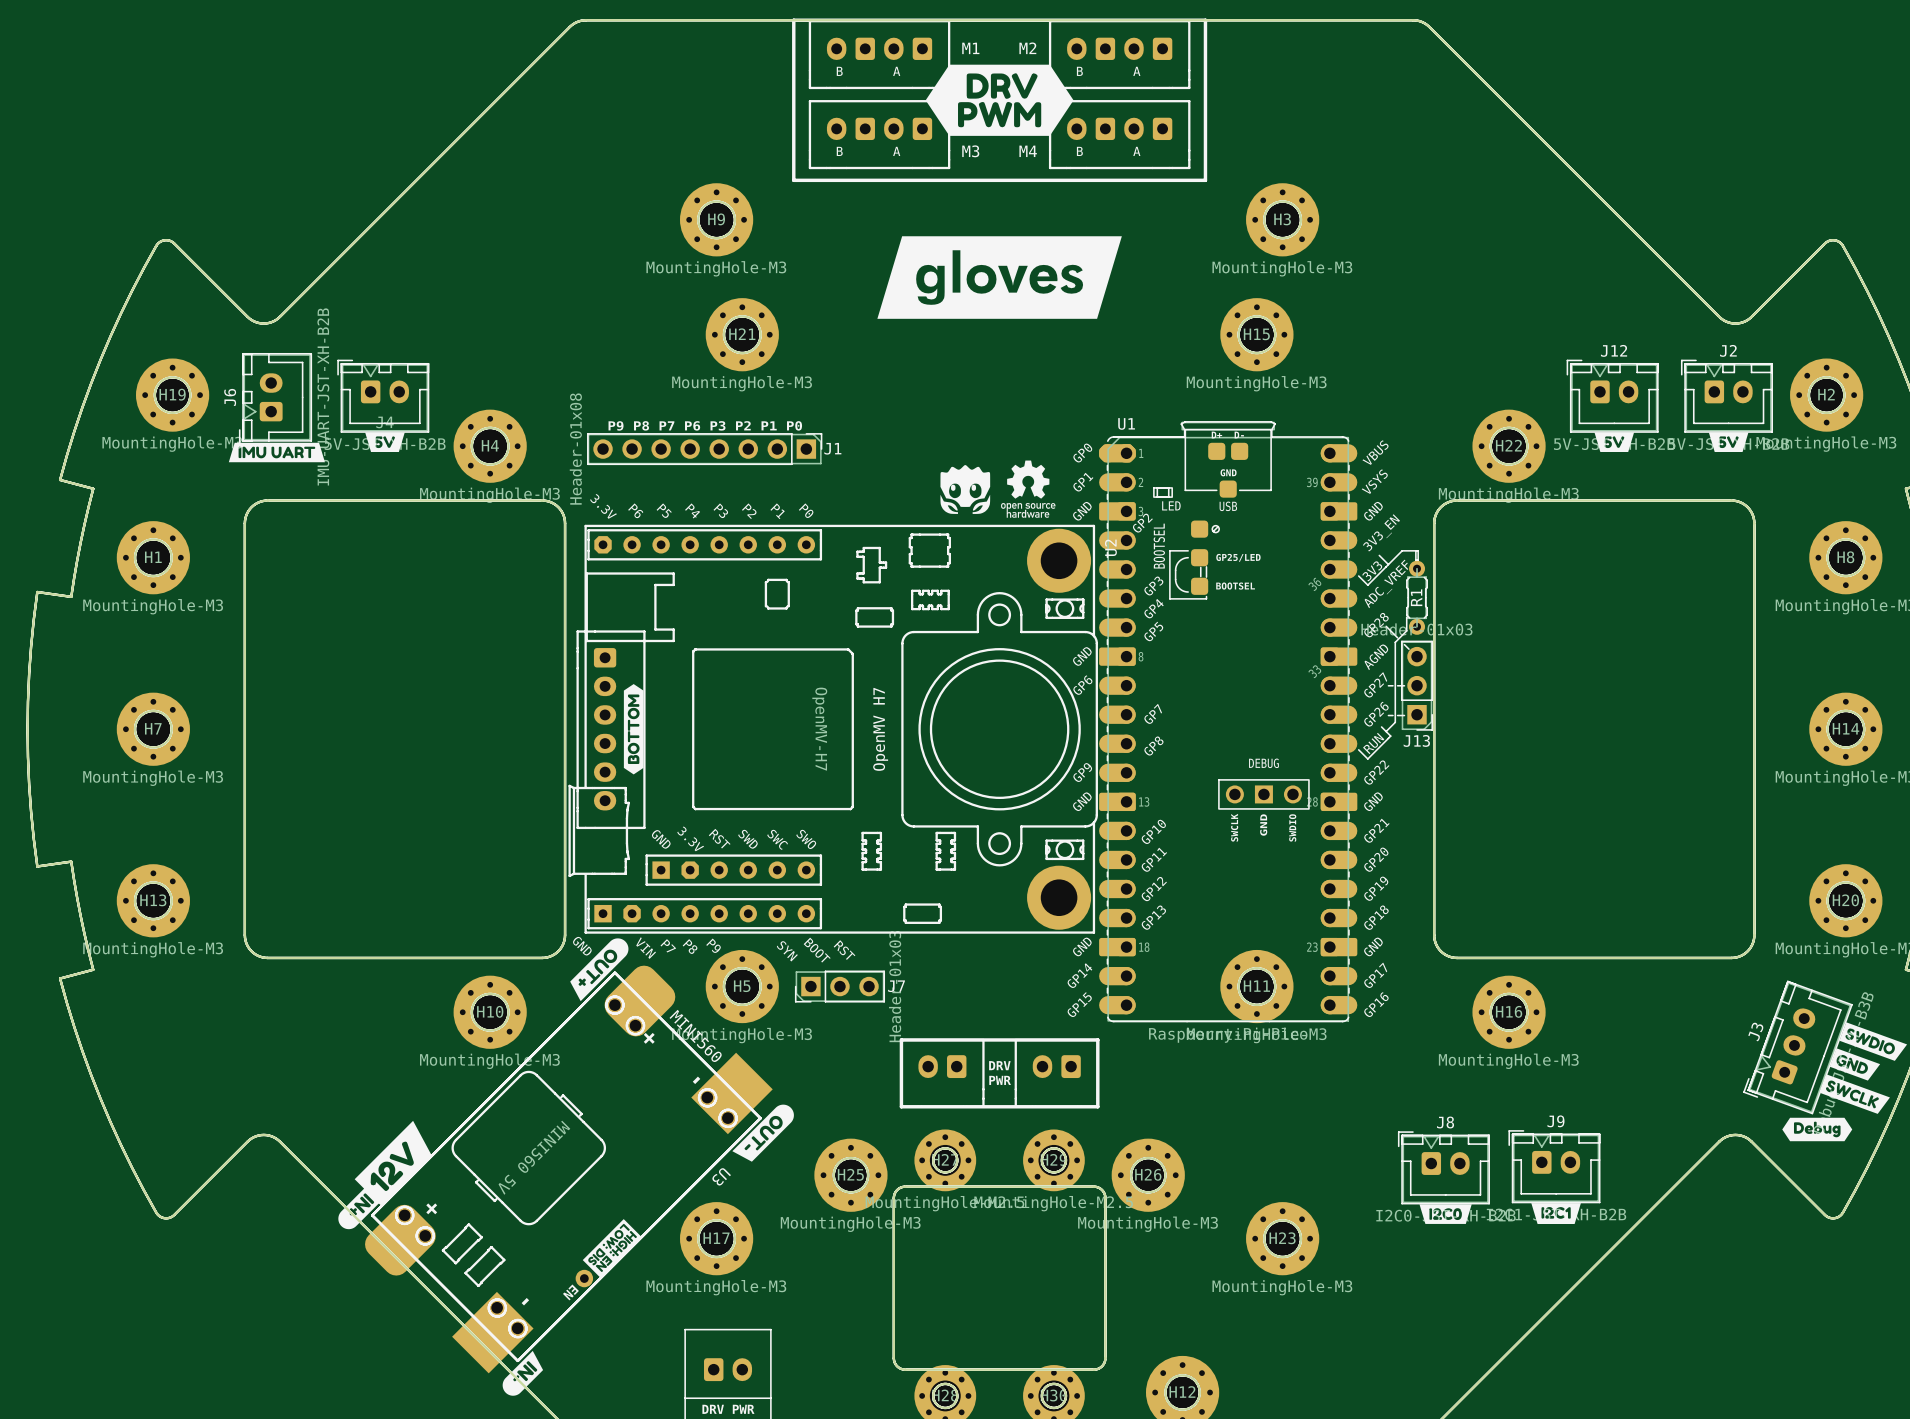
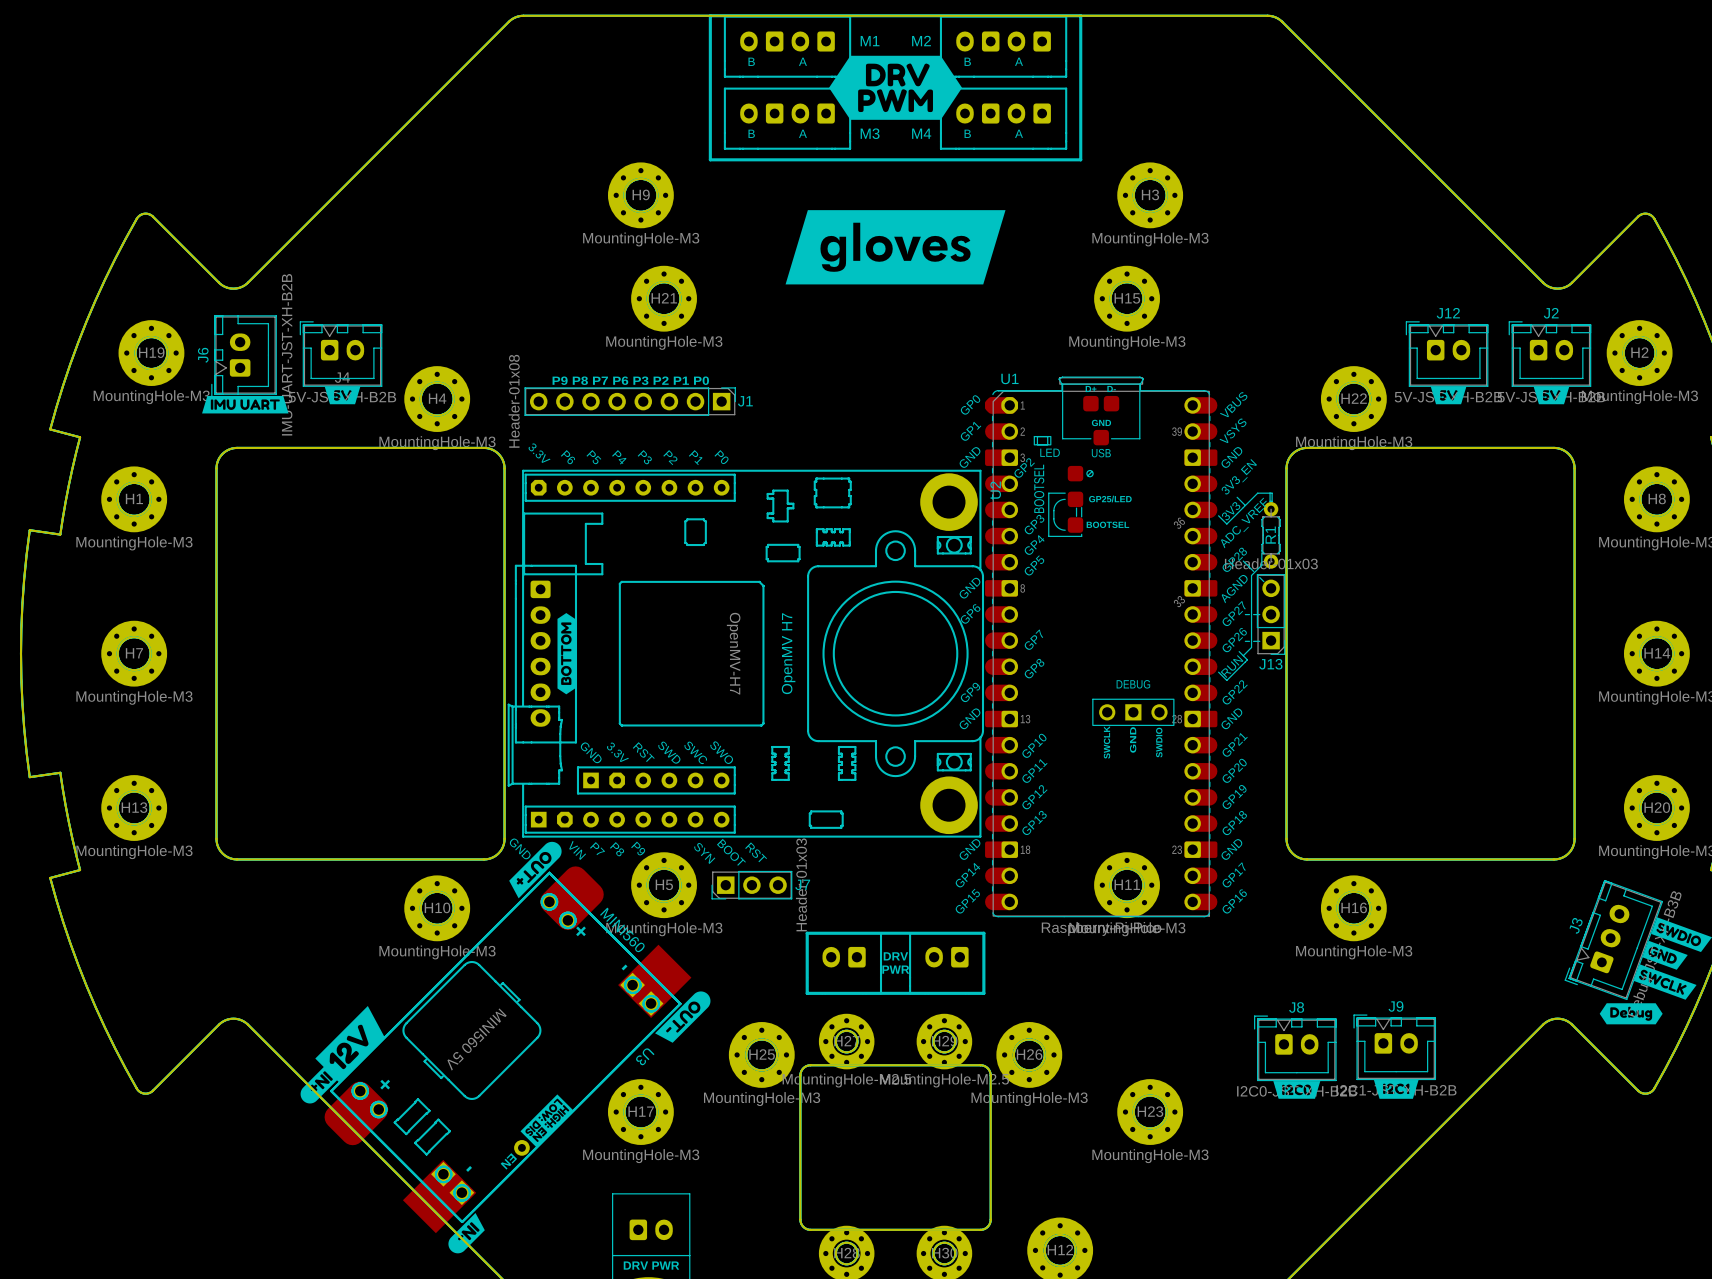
drawing: [940, 460, 1056, 518] -> none

